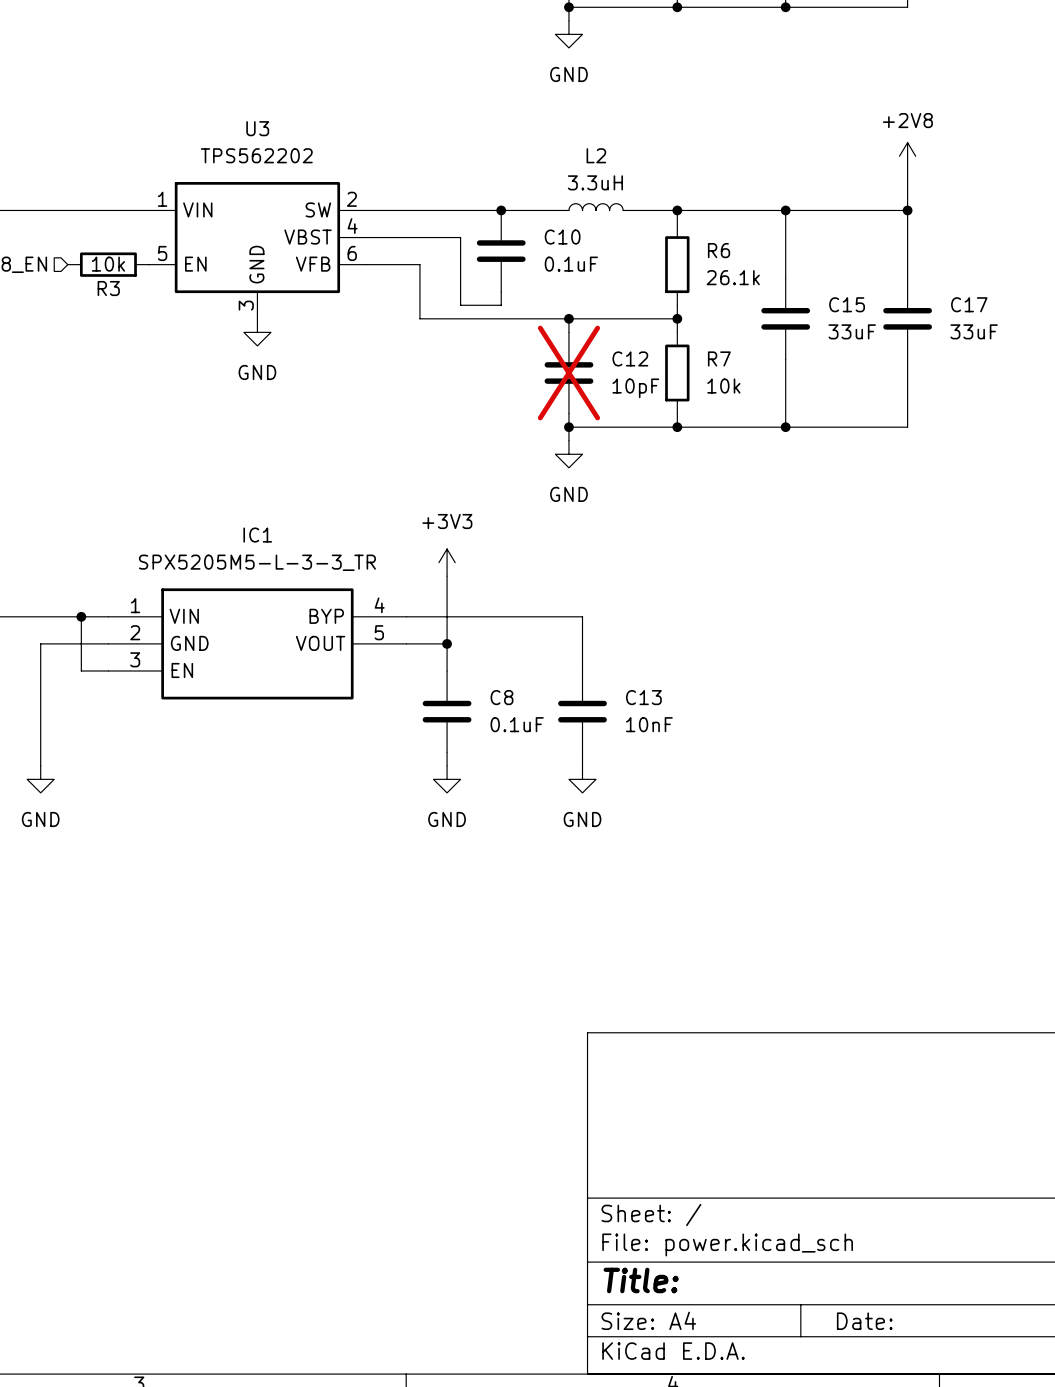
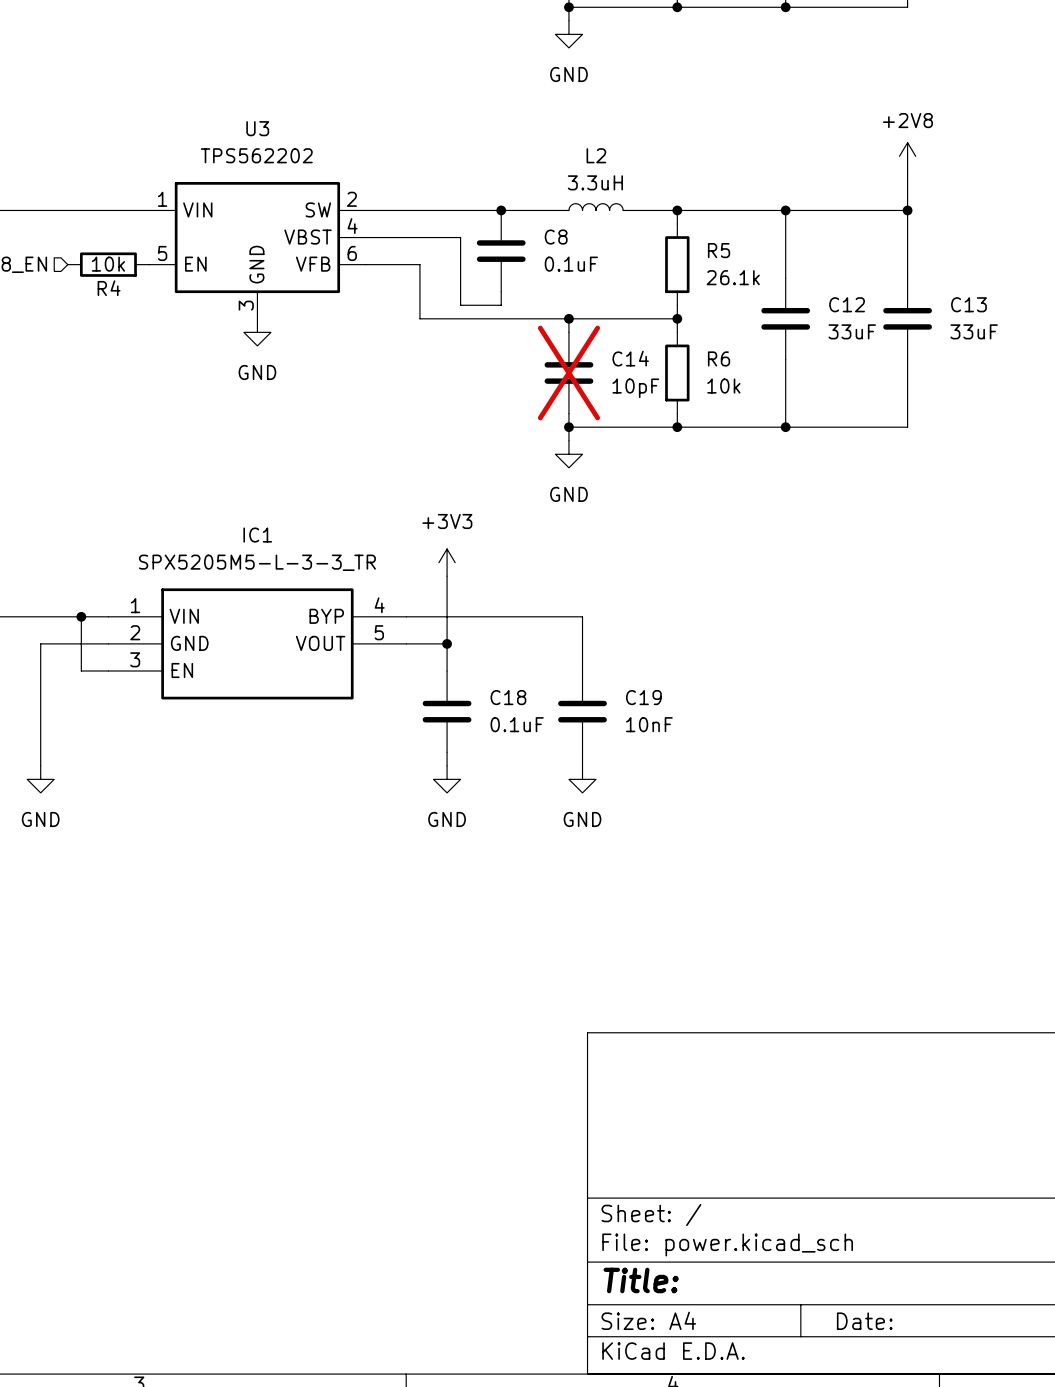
C10 name: C10 (562, 237) -> C8 (556, 237)
R6 name: R6 (719, 250) -> R5 (719, 250)
R3 name: R3 (108, 288) -> R4 (109, 288)
C15 name: C15 (847, 304) -> C12 (847, 304)
C17 name: C17 (969, 304) -> C13 (968, 304)
C12 name: C12 (630, 358) -> C14 (630, 358)
R7 name: R7 (719, 358) -> R6 (719, 358)
C8 name: C8 (501, 697) -> C18 (508, 697)
C13 name: C13 (643, 697) -> C19 (643, 697)

